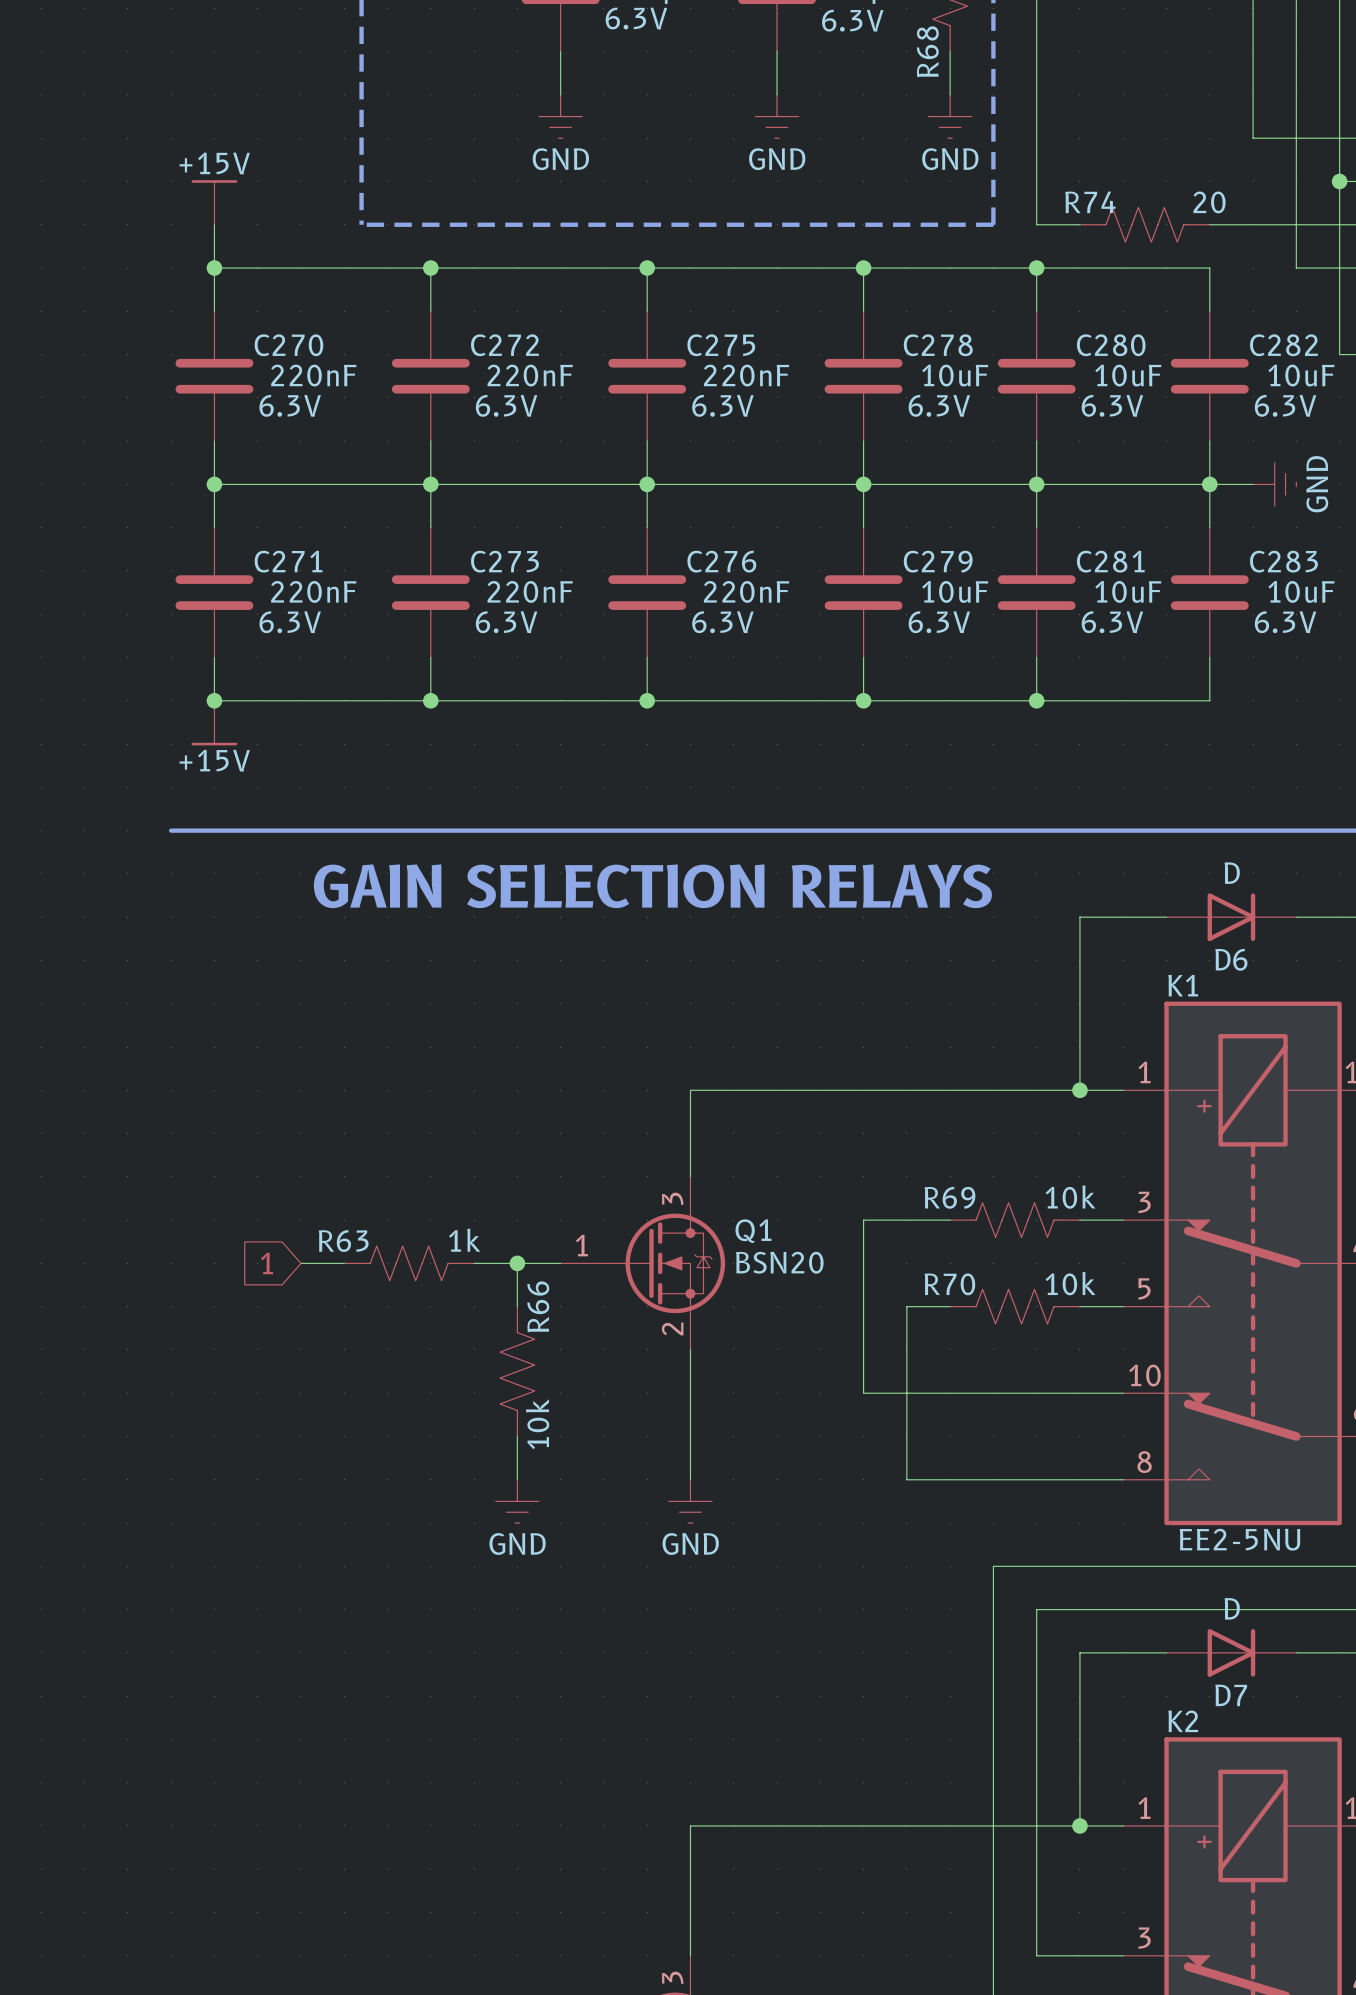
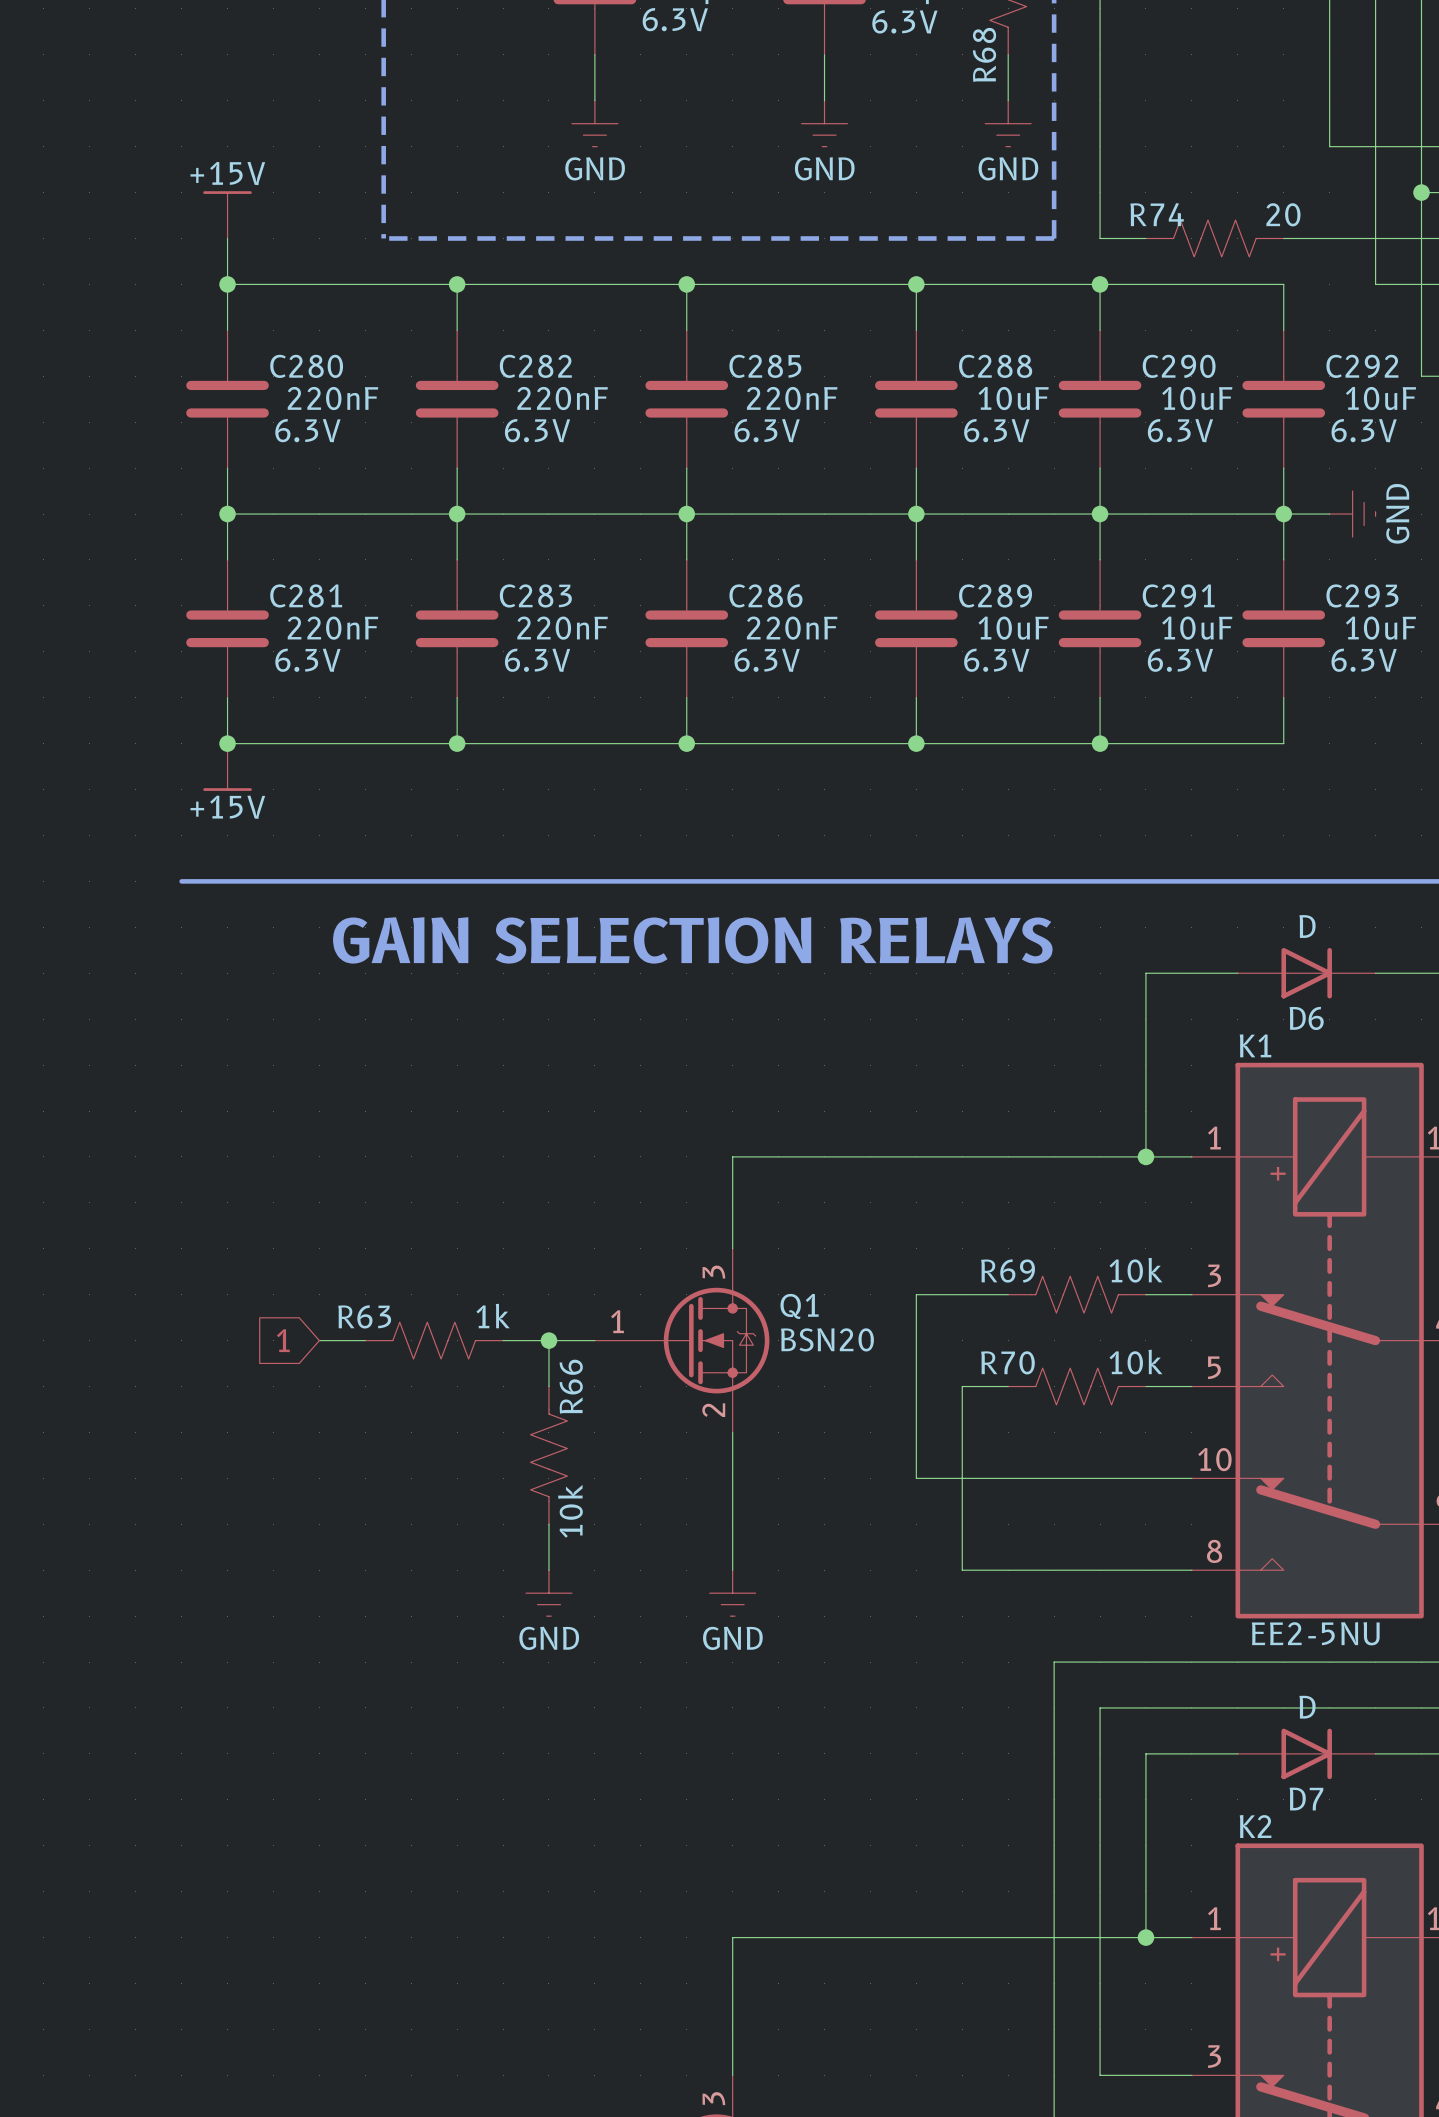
C270 name: C270 (288, 345) -> C280 (306, 366)
C272 name: C272 (504, 345) -> C282 (535, 366)
C275 name: C275 (721, 345) -> C285 (765, 366)
C278 name: C278 (938, 345) -> C288 (995, 366)
C280 name: C280 (1111, 345) -> C290 (1179, 366)
C282 name: C282 (1283, 345) -> C292 (1362, 366)
C271 name: C271 (288, 561) -> C281 (306, 595)
C273 name: C273 (504, 561) -> C283 (535, 595)
C276 name: C276 (721, 561) -> C286 (765, 595)
C279 name: C279 (938, 561) -> C289 (995, 595)
C281 name: C281 (1110, 561) -> C291 (1178, 595)
C283 name: C283 (1283, 561) -> C293 (1362, 595)

